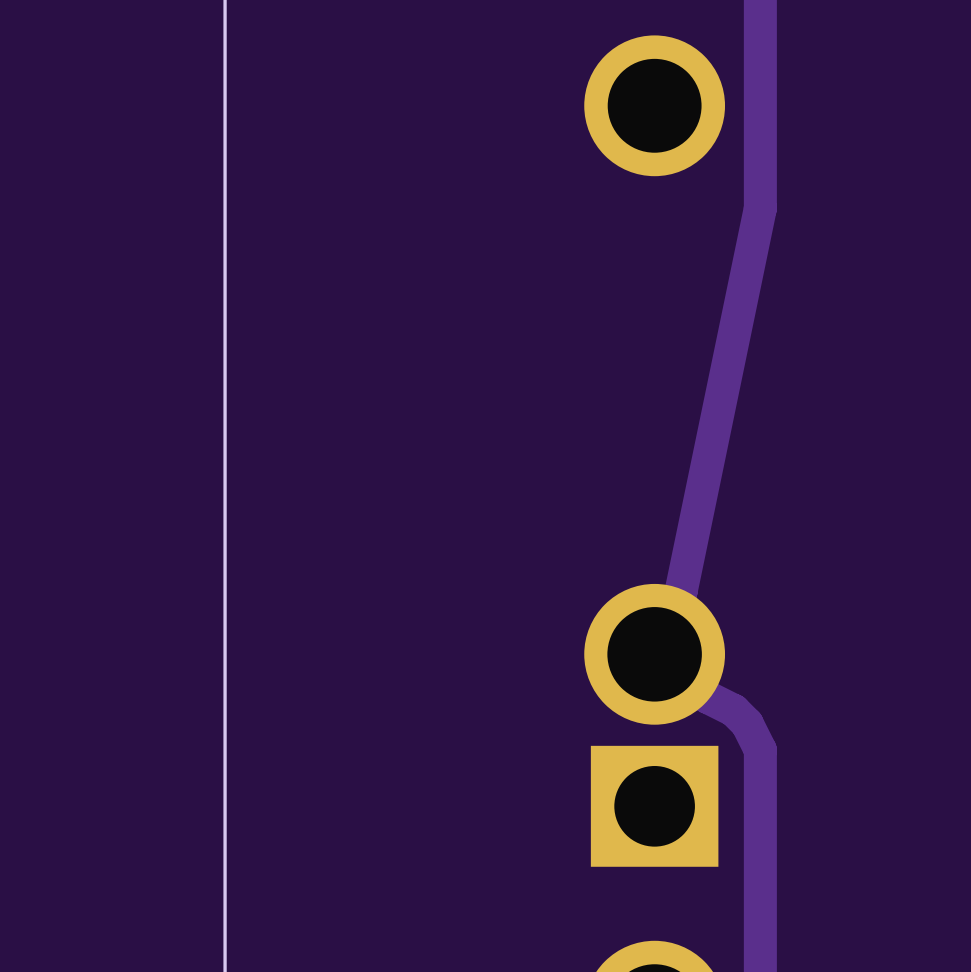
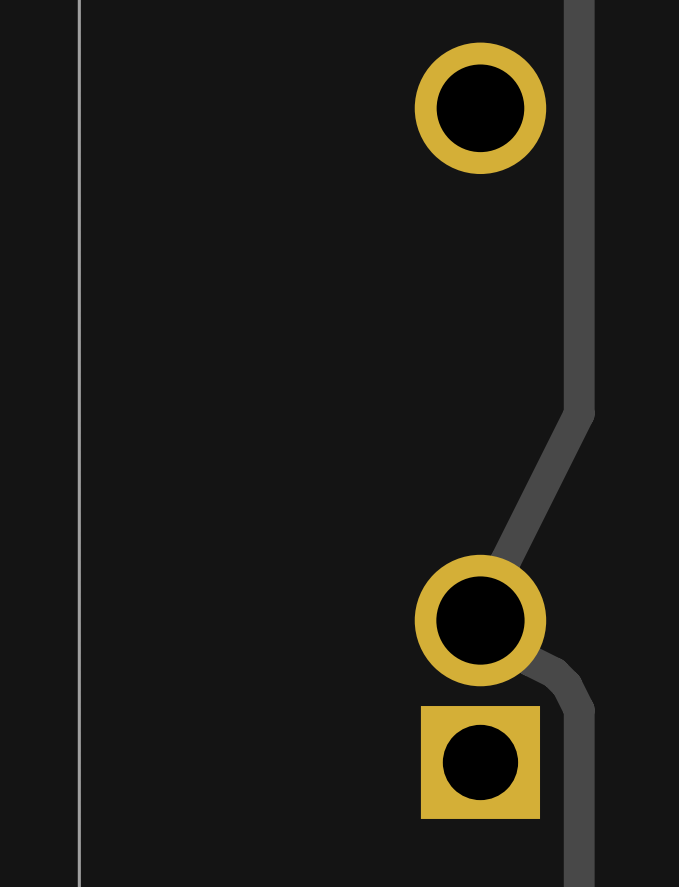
track: (760, 208) (681, 591) -> (579, 203) (579, 413) (505, 561)

